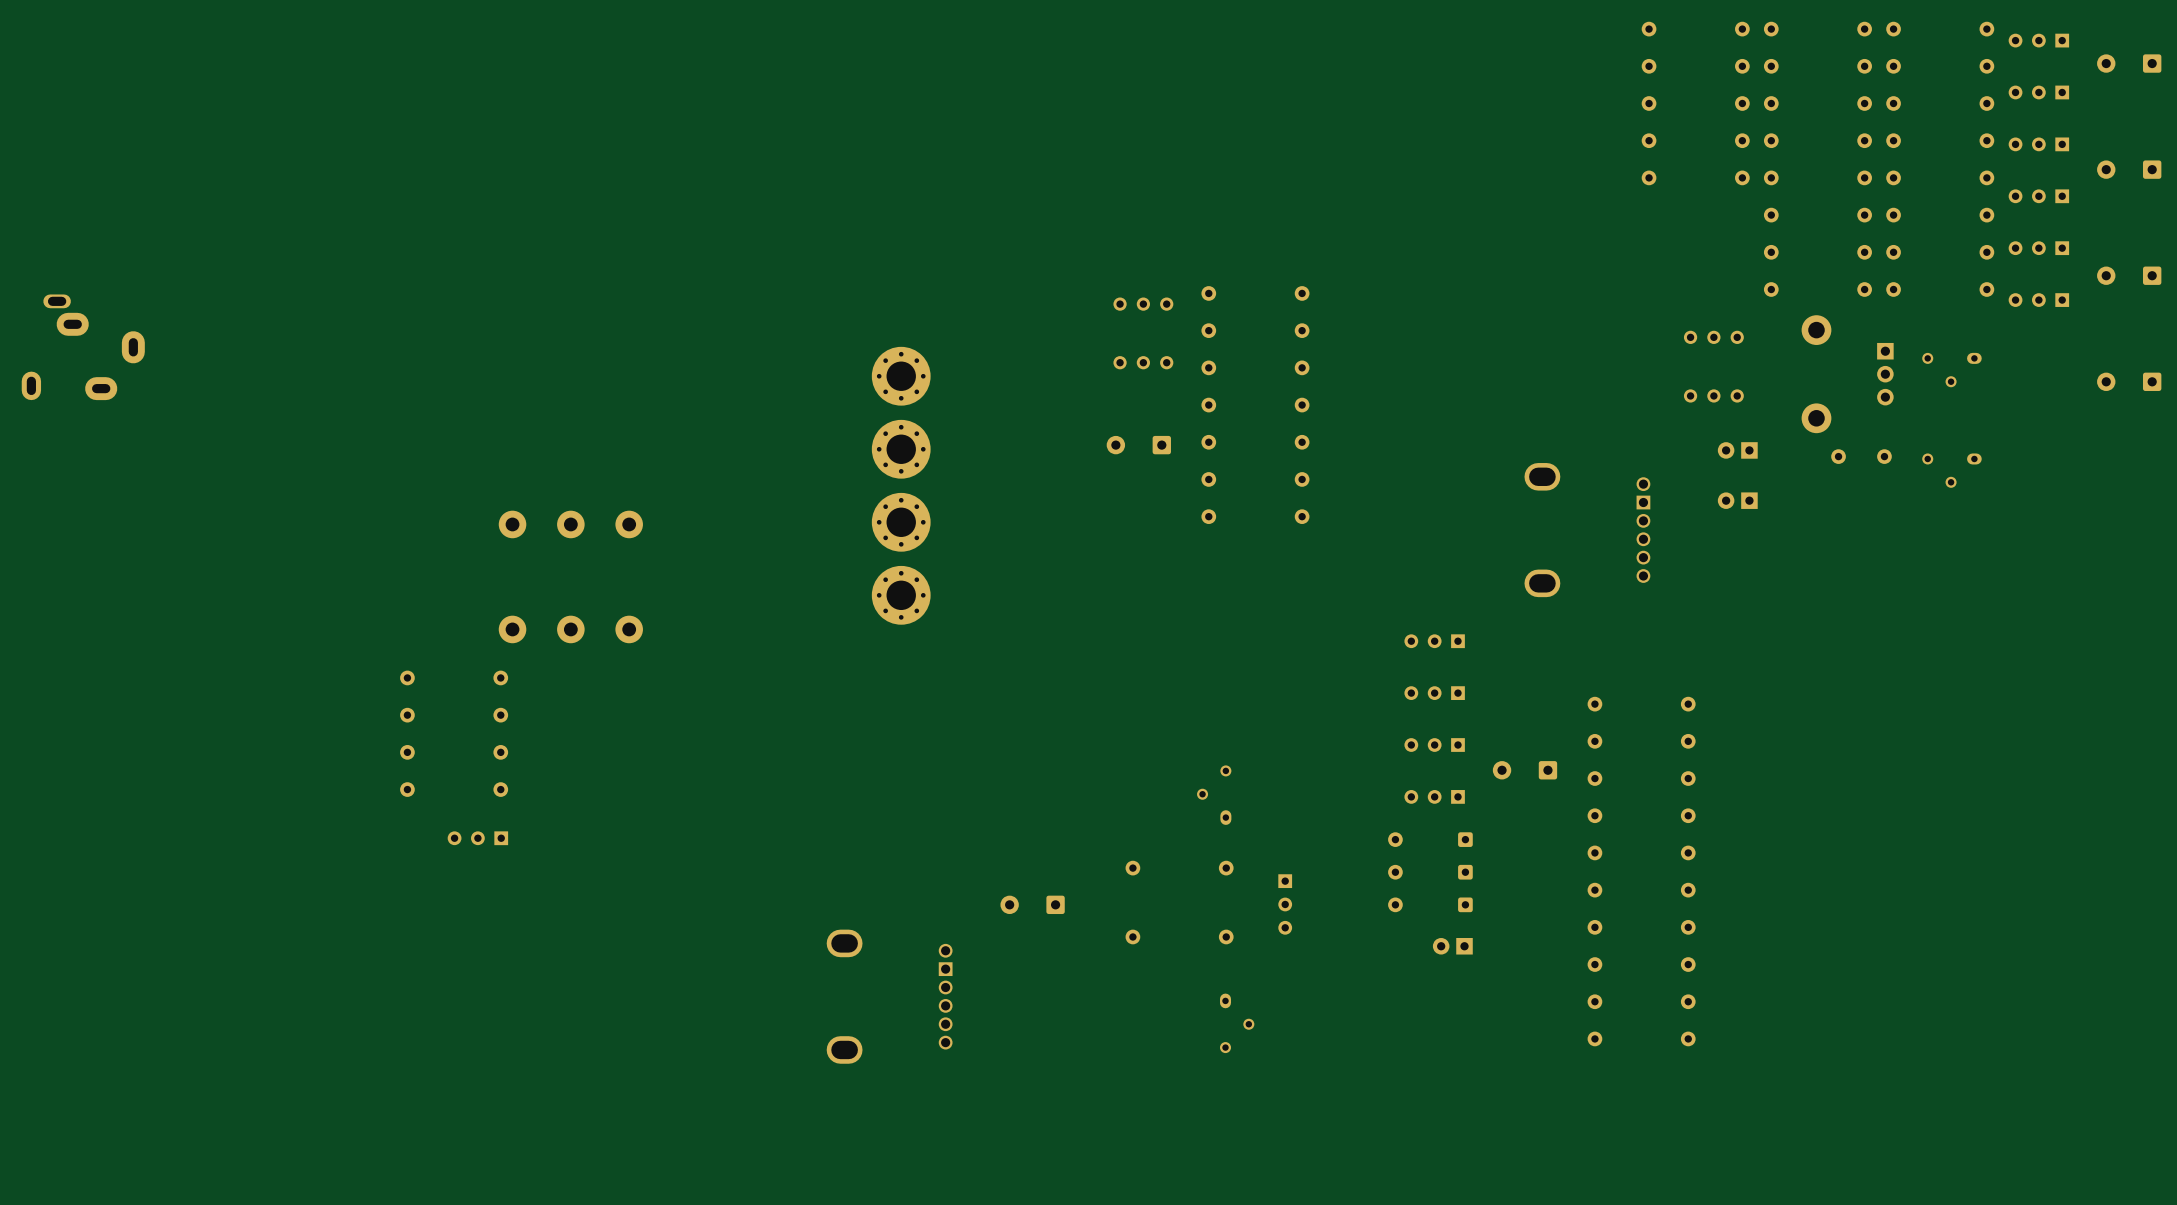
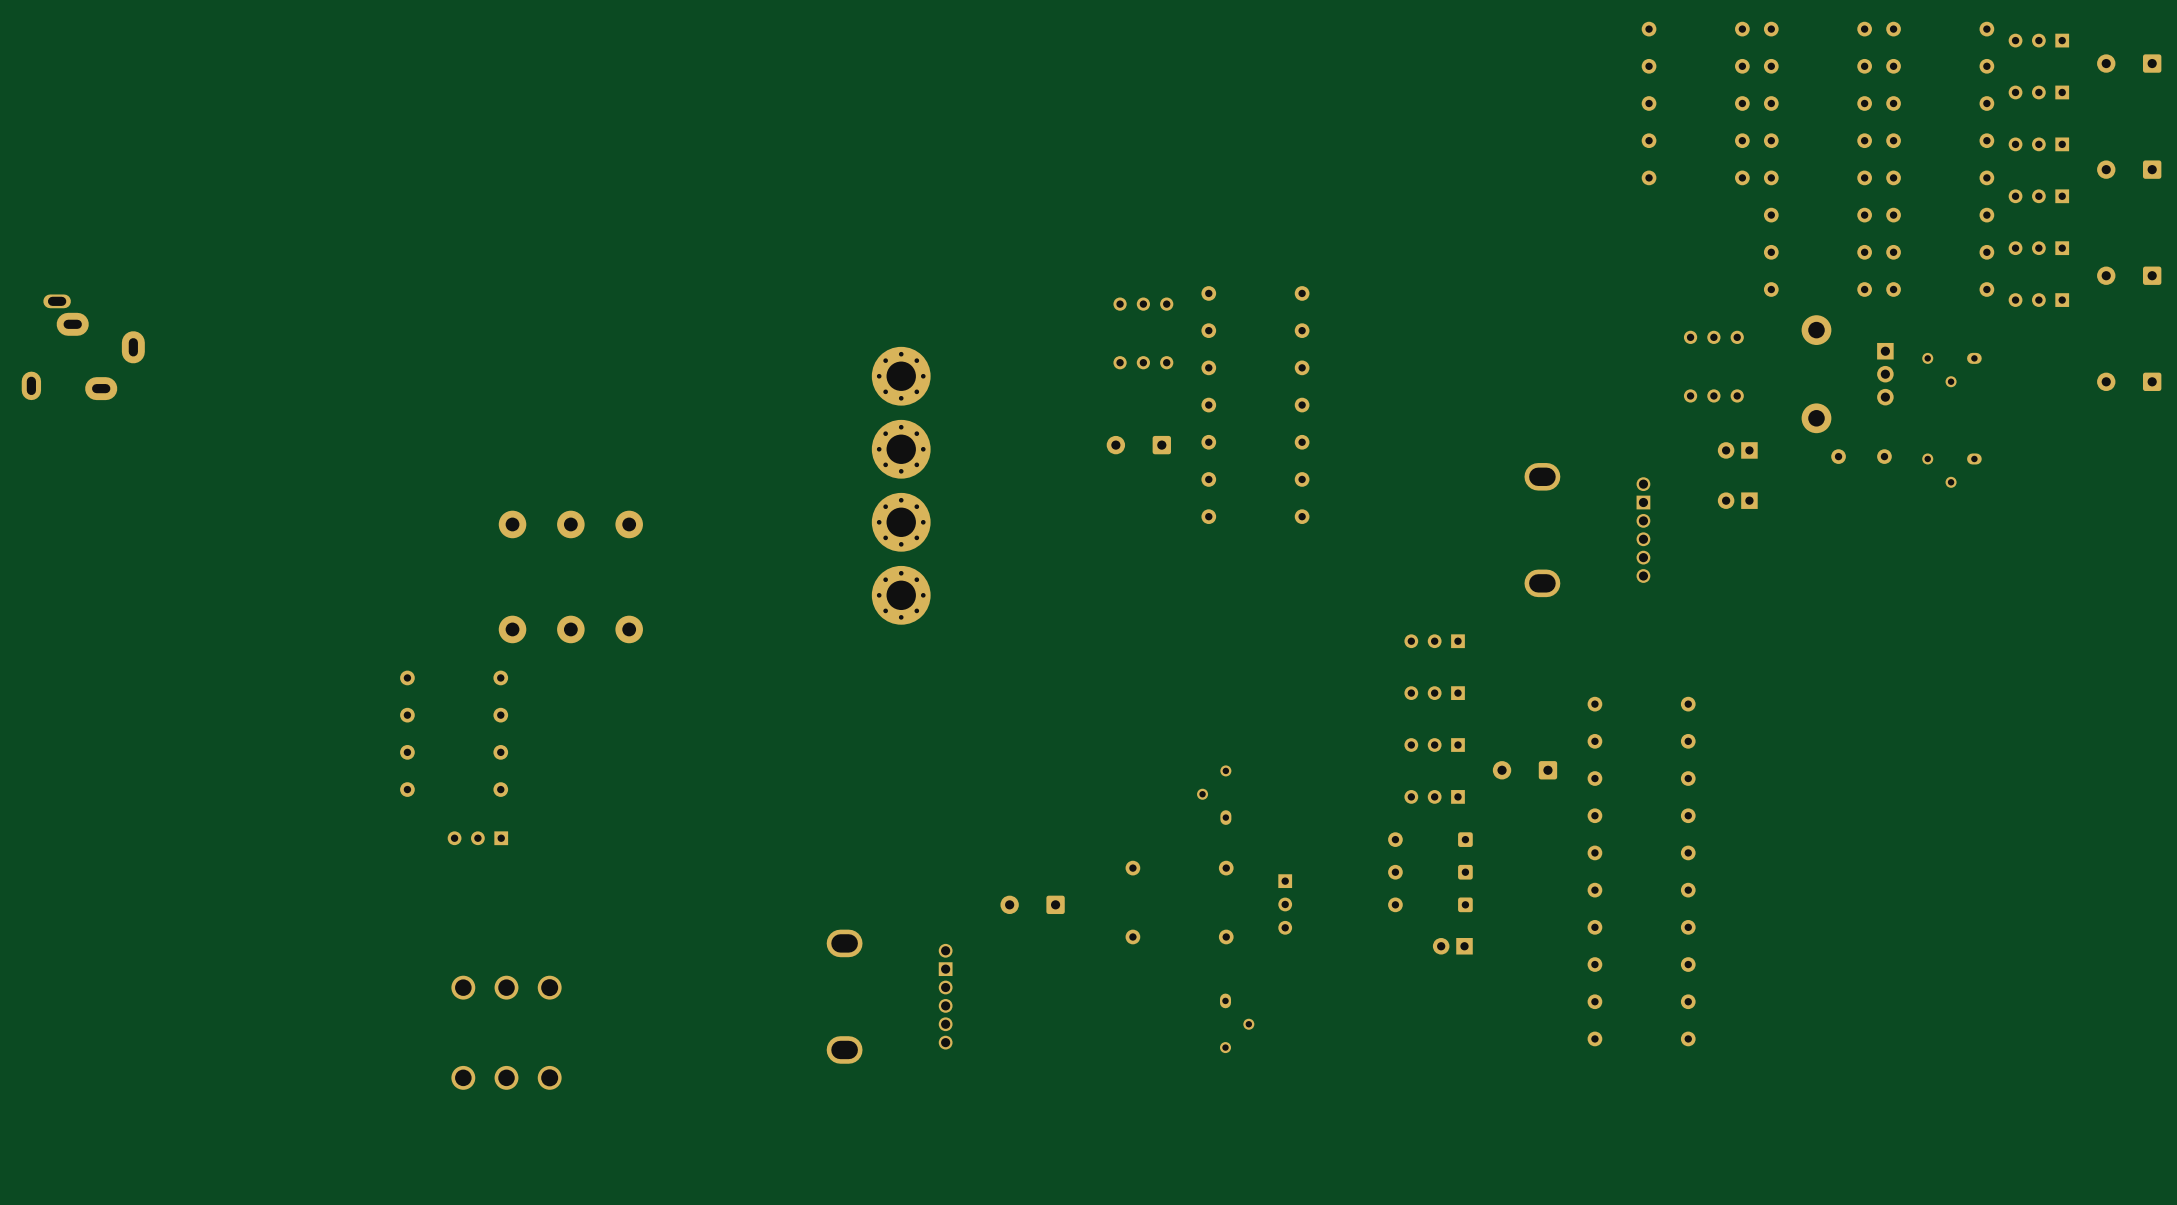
part: none -> (506, 987)
part: none -> (506, 1077)

